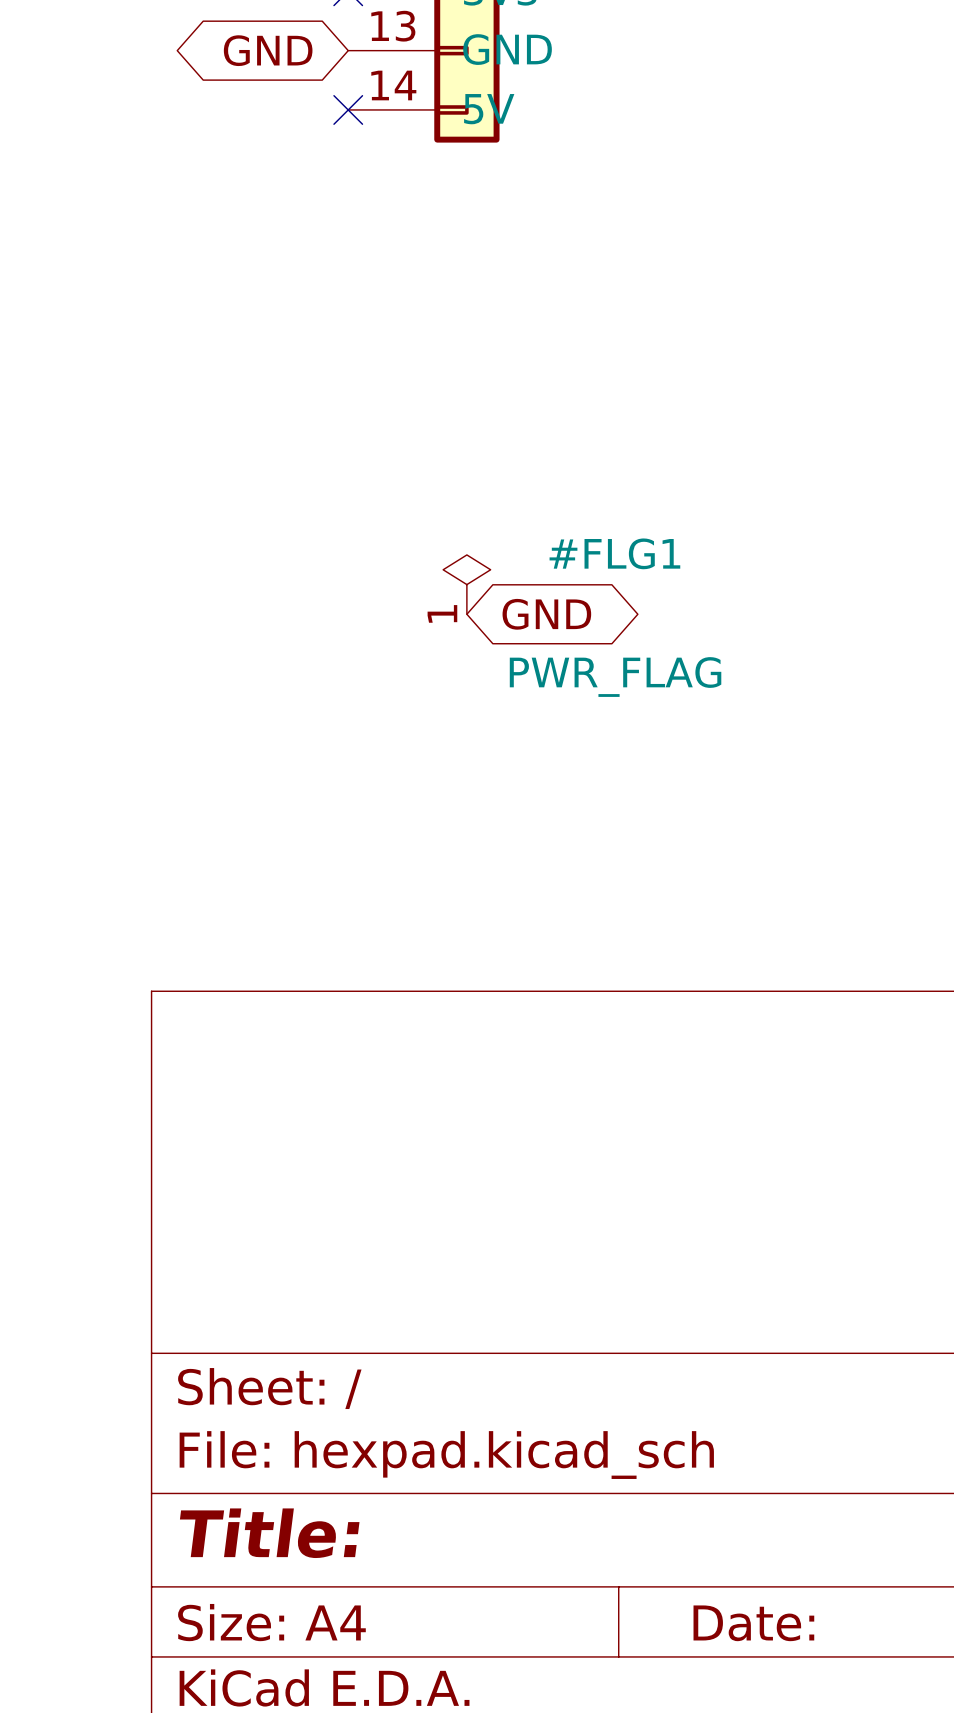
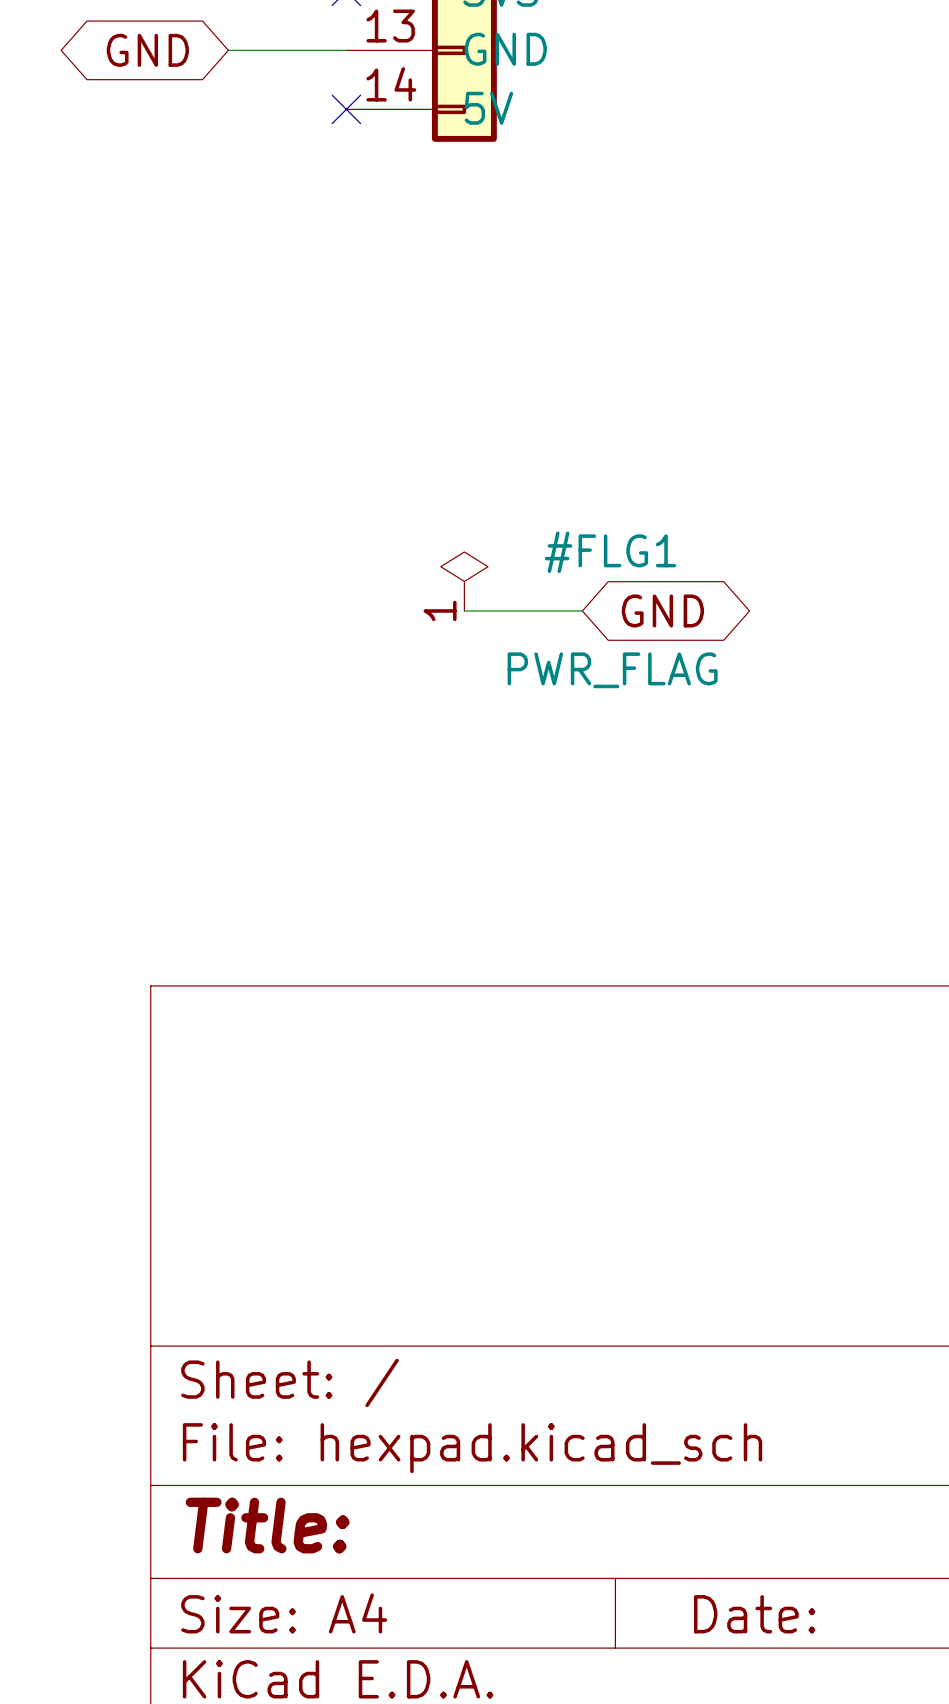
wire: none -> (228, 50) (346, 50)
global label position: GND (268, 50) -> GND (147, 50)
wire: none -> (464, 610) (582, 610)
global label position: GND (546, 614) -> GND (662, 610)

